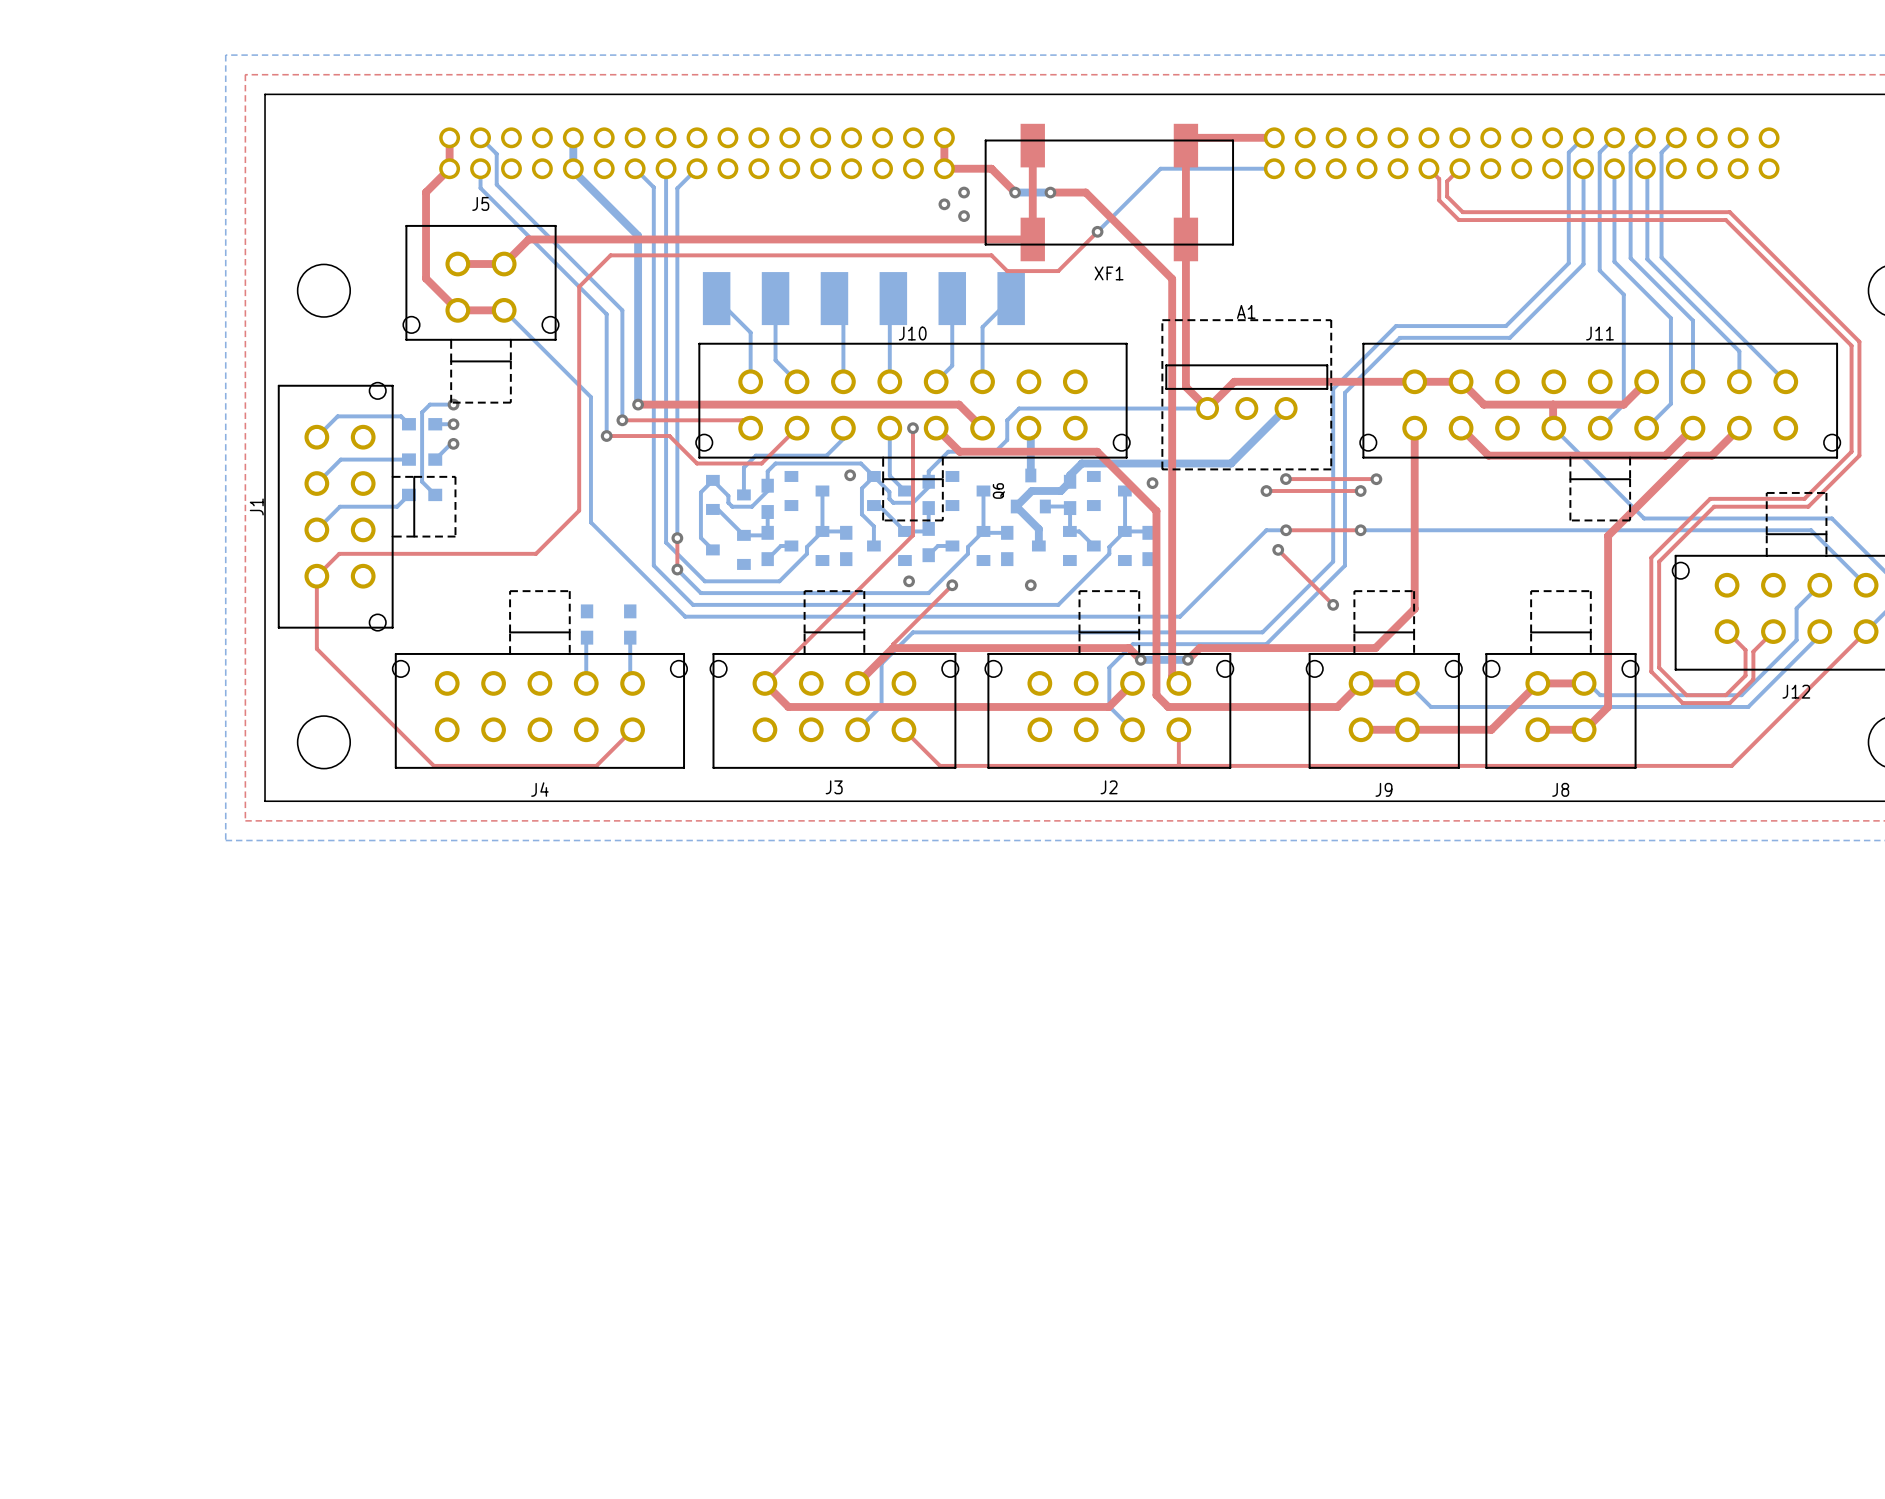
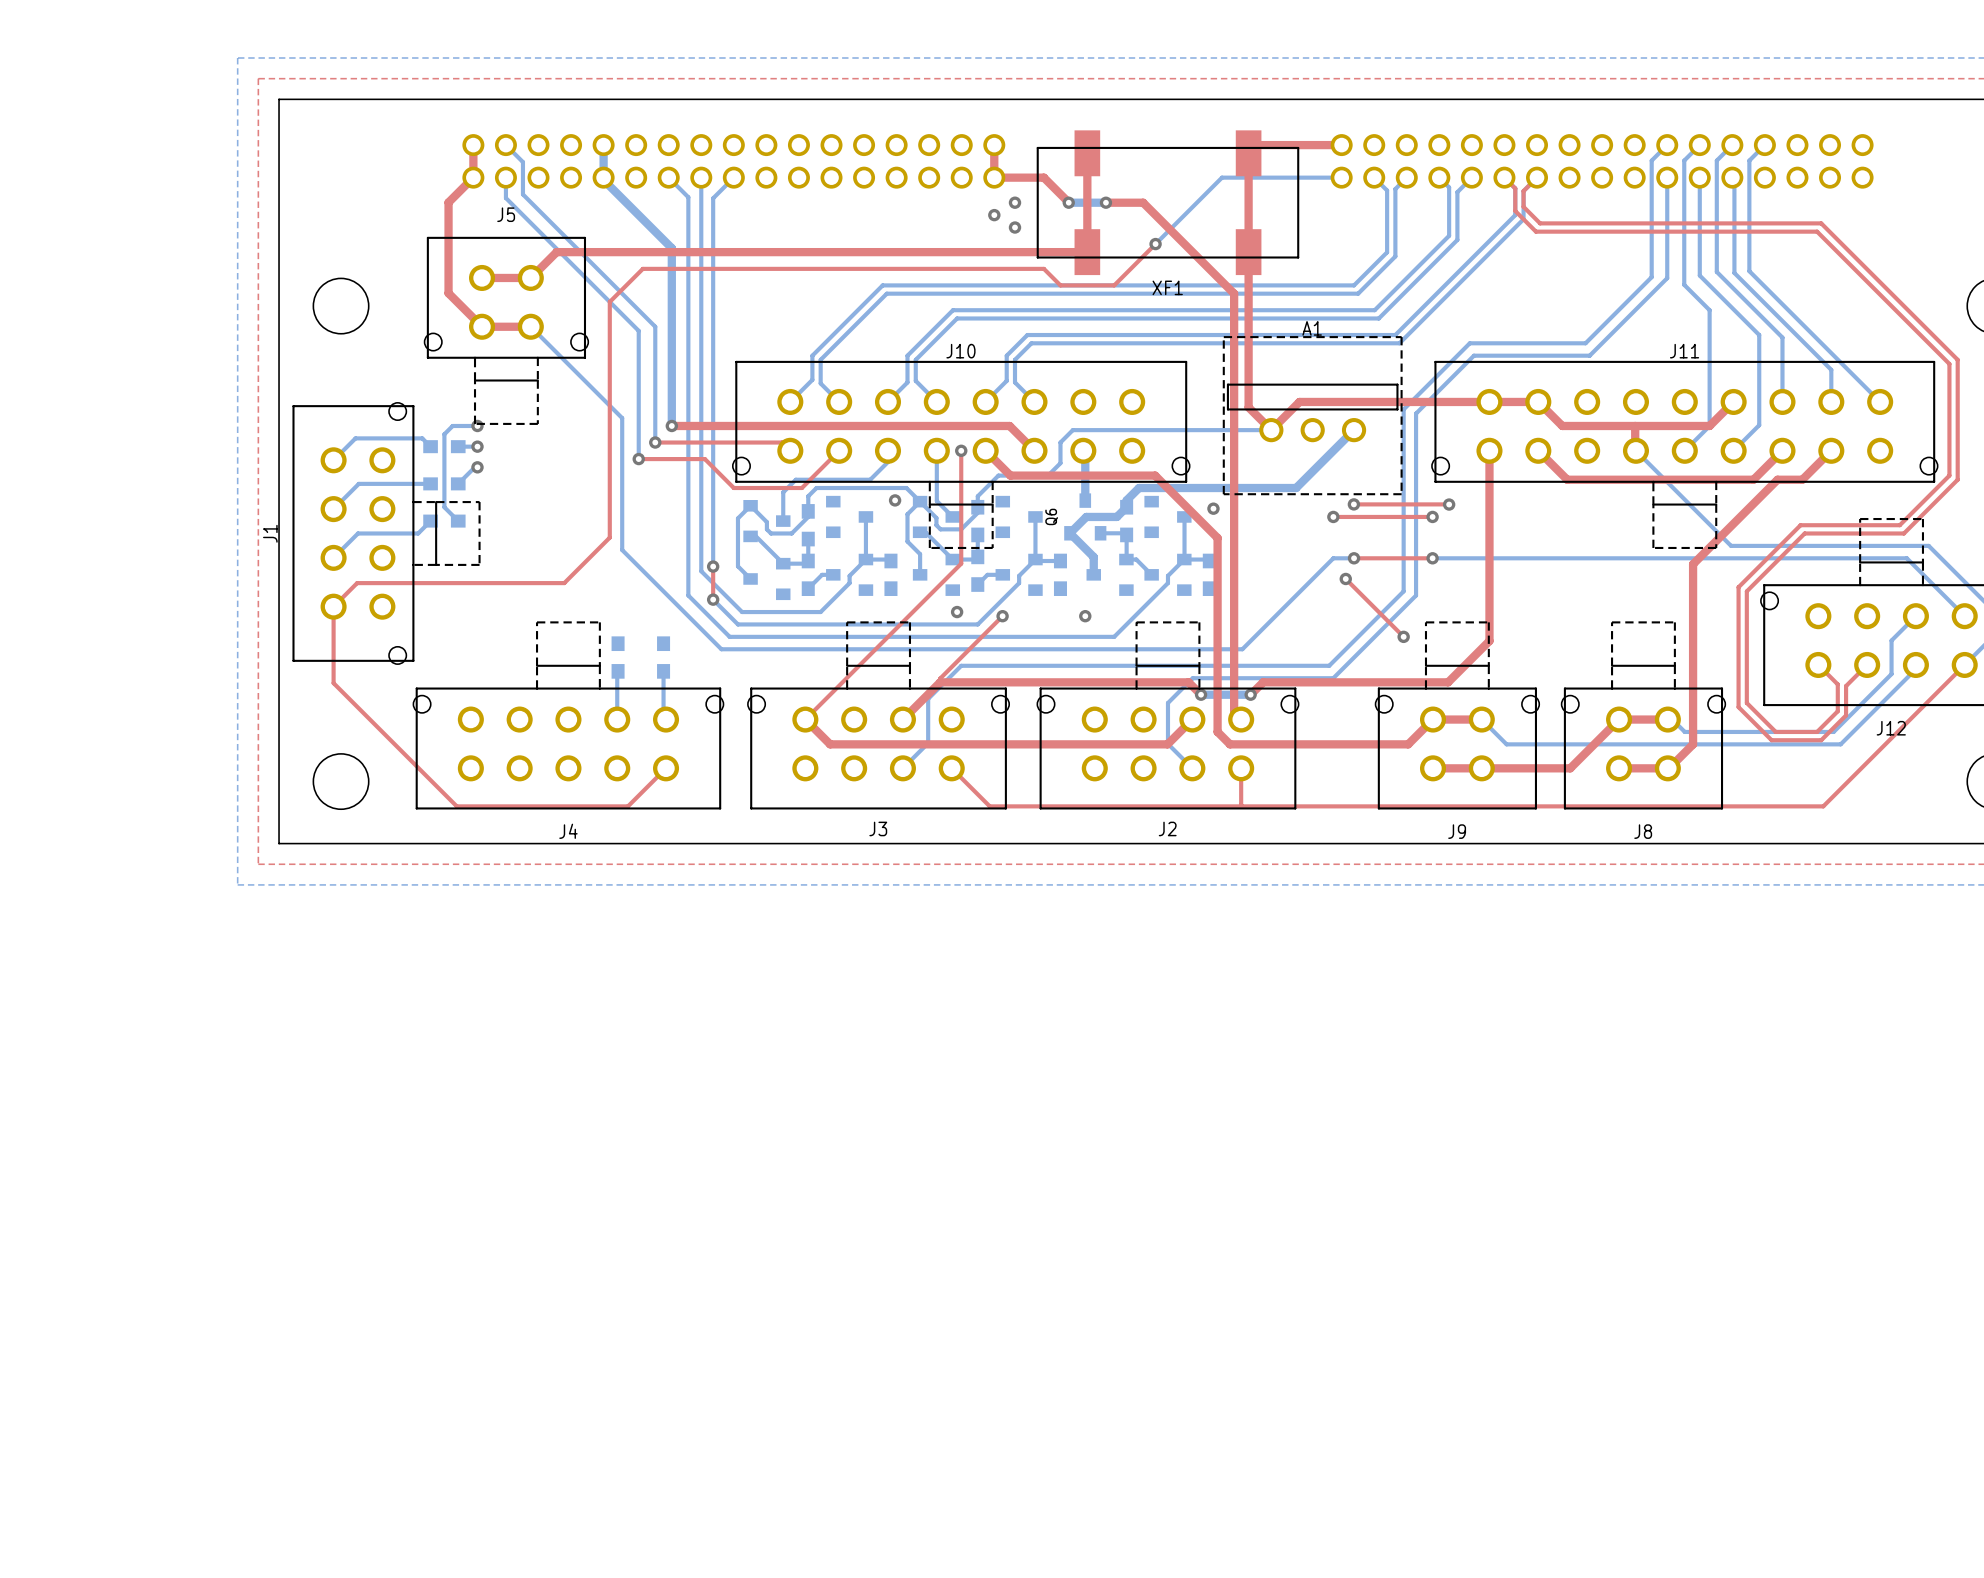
bottom track: (716, 298) (750, 332) (750, 381) -> (1374, 177) (1387, 190) (1387, 252) (1354, 285) (882, 285) (812, 355) (812, 379) (790, 401)
part: (716, 298) -> none
bottom track: (775, 298) (775, 360) (779, 364) -> (1406, 177) (1395, 189) (1395, 256) (1358, 293) (886, 293) (820, 359) (820, 383)
part: (775, 298) -> none
bottom track: (834, 298) (843, 307) (843, 381) -> (1439, 177) (1449, 187) (1449, 235) (1374, 310) (952, 310) (907, 355) (907, 382) (887, 401)
part: (834, 298) -> none
bottom track: (893, 298) (889, 302) (889, 381) -> (1471, 177) (1457, 192) (1457, 239) (1378, 318) (957, 318) (915, 359) (915, 380) (936, 401)
part: (893, 298) -> none
bottom track: (952, 298) (952, 365) -> (1504, 177) (1515, 188) (1515, 215) (1395, 335) (1027, 335) (1006, 355) (1006, 380) (1002, 385)
part: (952, 298) -> none
bottom track: (1011, 298) (982, 327) (982, 381) -> (1537, 177) (1523, 191) (1523, 219) (1399, 343) (1031, 343) (1014, 359) (1014, 382) (1034, 401)
part: (1011, 298) -> none

